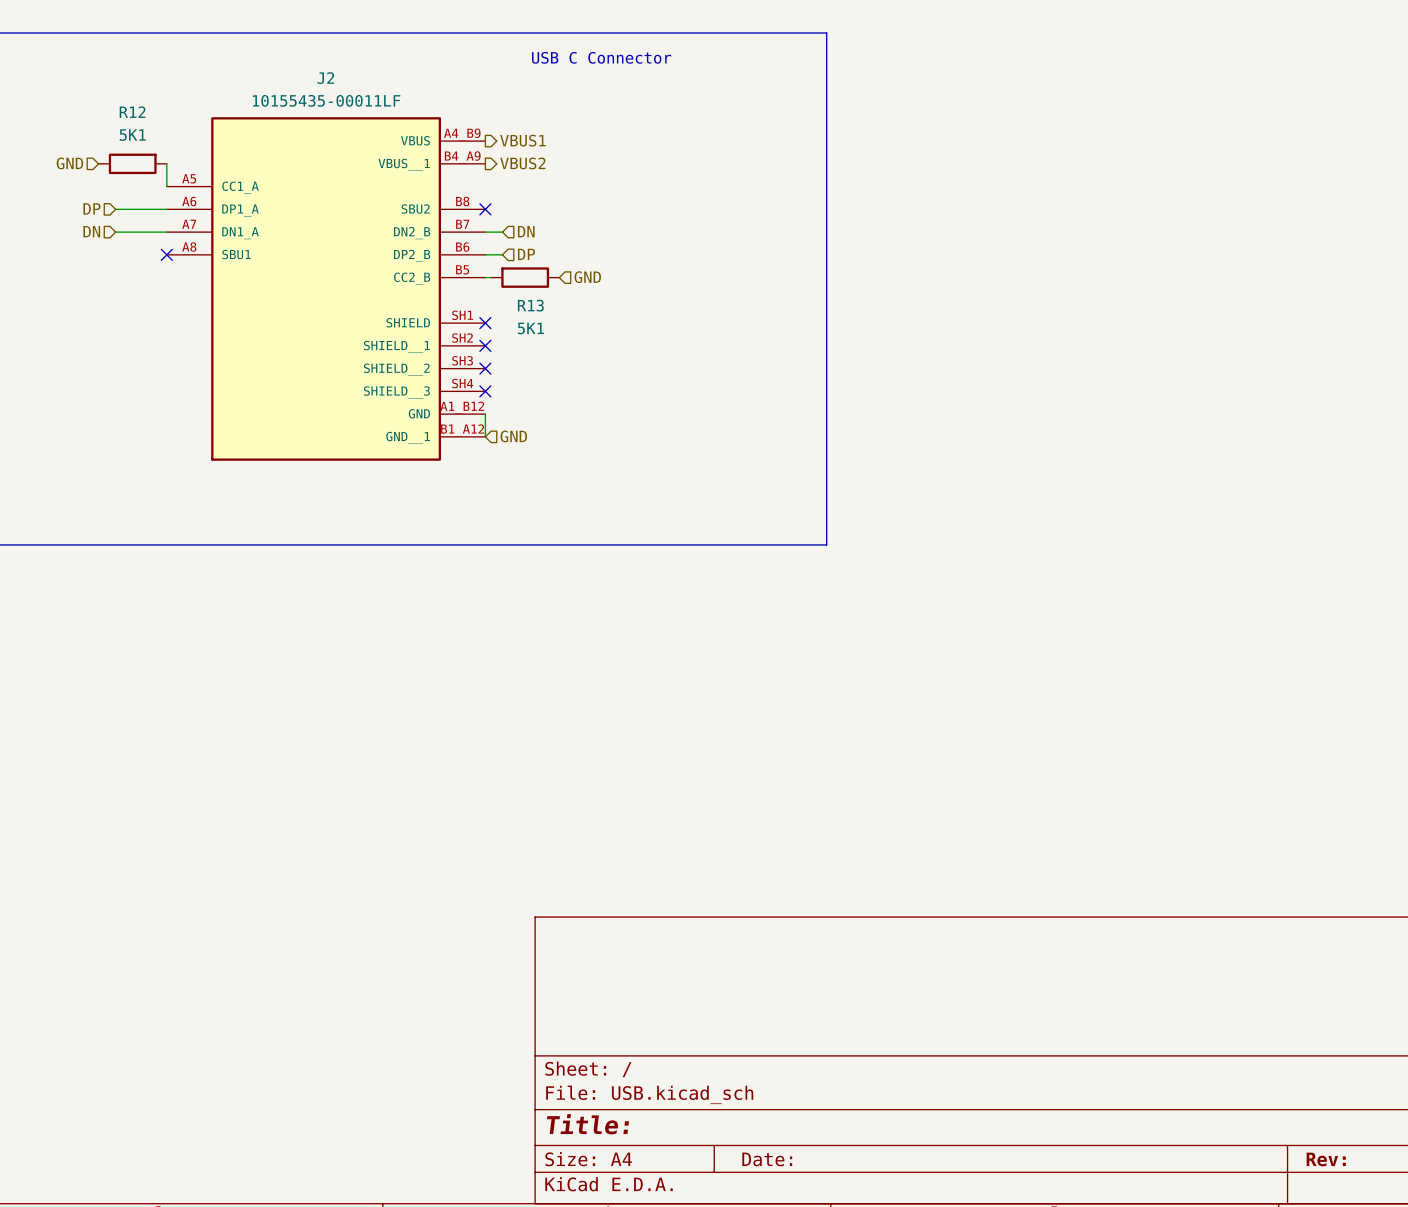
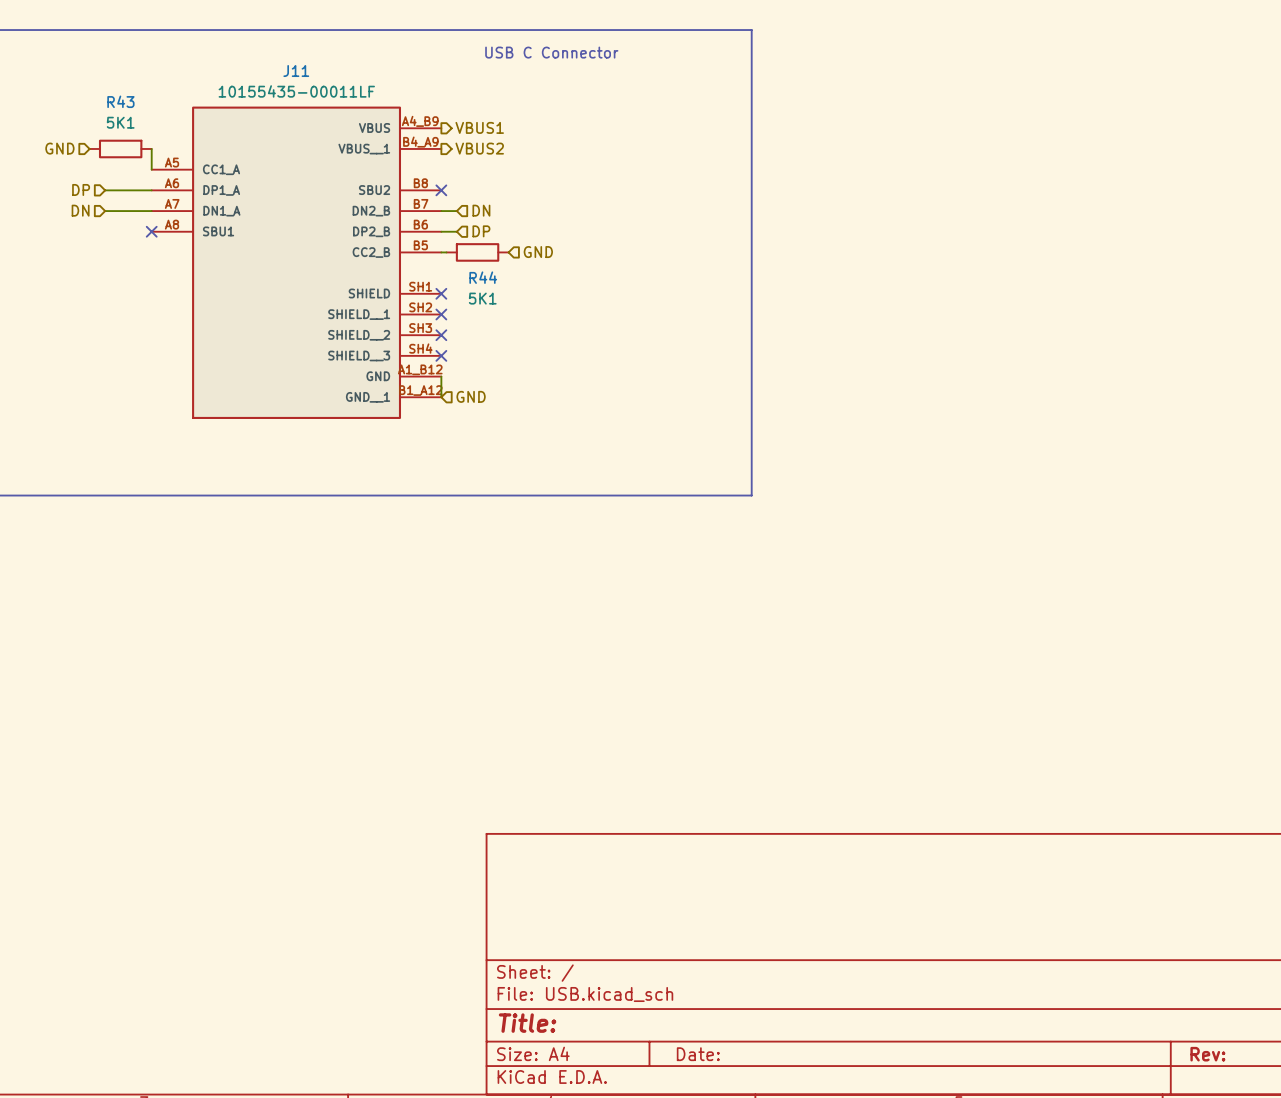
J2 name: J2 (325, 78) -> J11 (296, 71)
R12 name: R12 (132, 112) -> R43 (120, 101)
R13 name: R13 (530, 305) -> R44 (483, 277)

